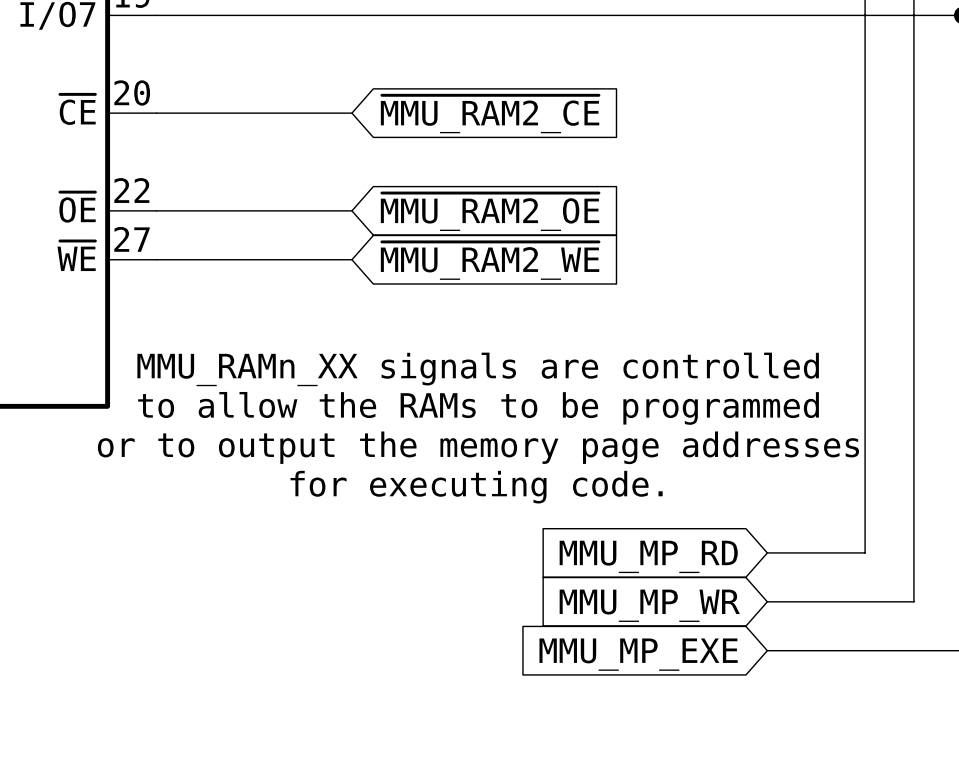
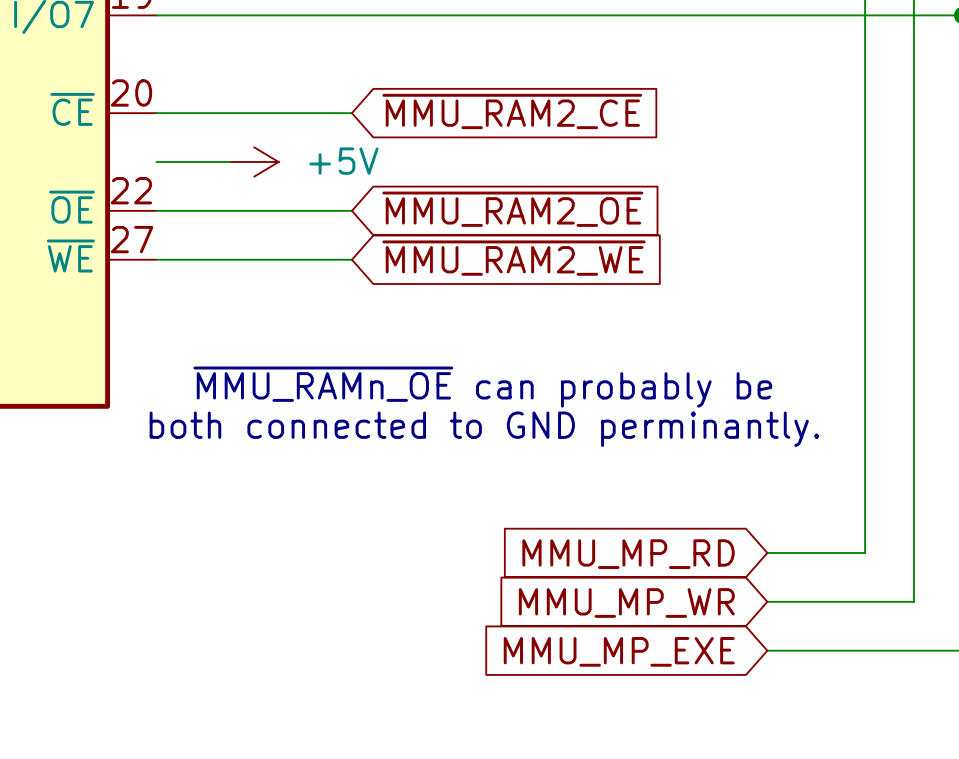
wire: none -> (156, 162) (229, 162)
power symbol: none -> +5V (254, 162)
text: MMU_RAMn_XX signals are controlled (478, 369) -> none
text: none -> ~{MMU_RAMn_OE} can probably be (482, 387)
text: to allow the RAMs to be programmed (478, 408) -> none
text: none -> both connected to GND perminantly. (484, 429)
text: or to output the memory page addresses (478, 447) -> none
text: for executing code. (476, 487) -> none

